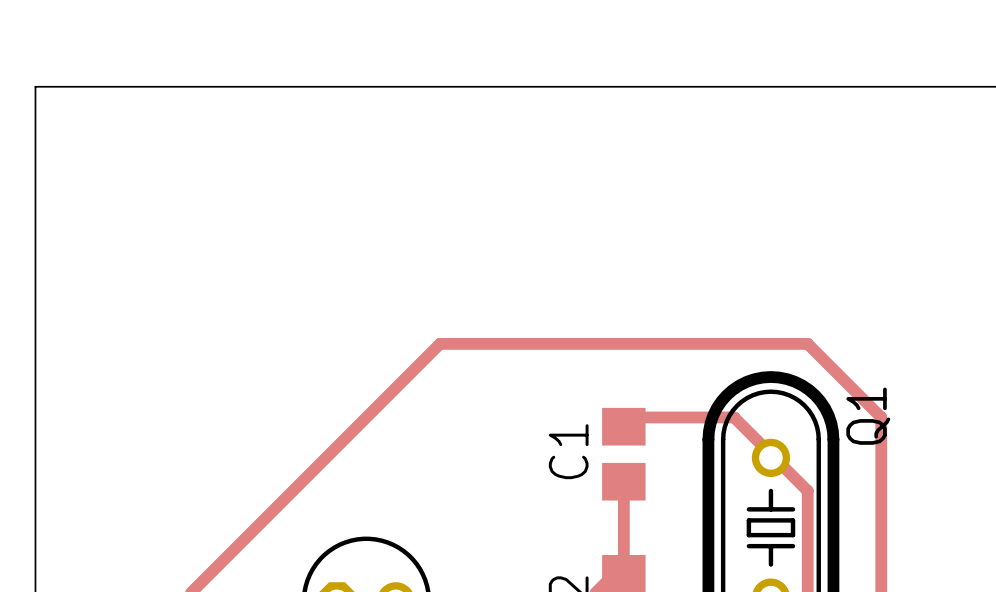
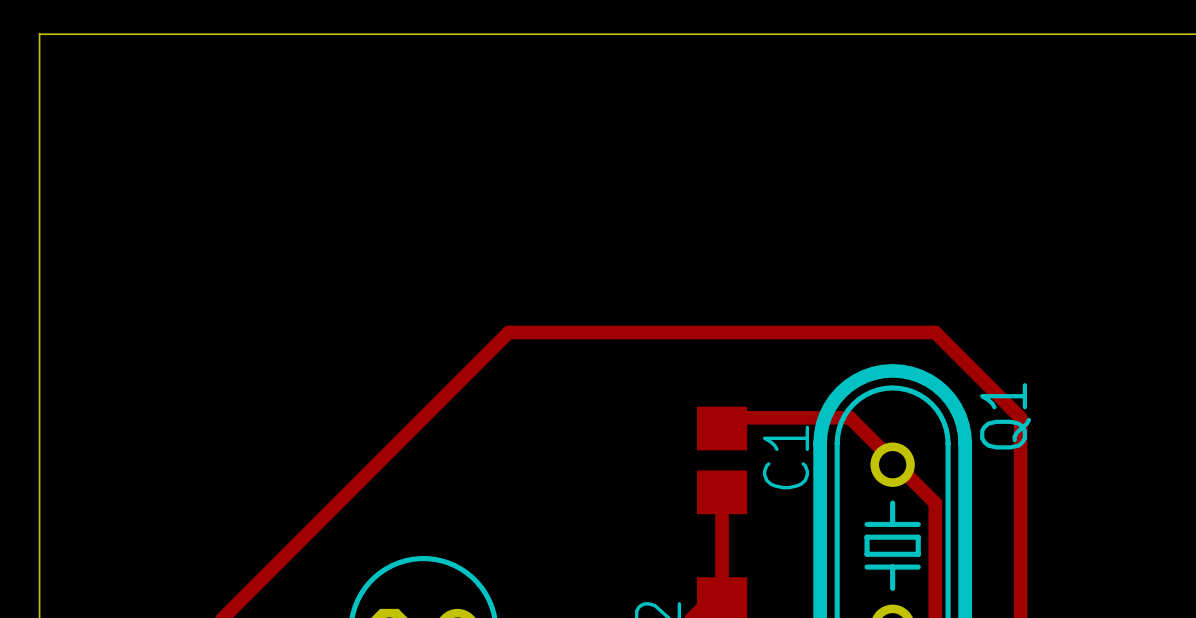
C1 name position: C1 (568, 451) -> C1 (786, 457)

